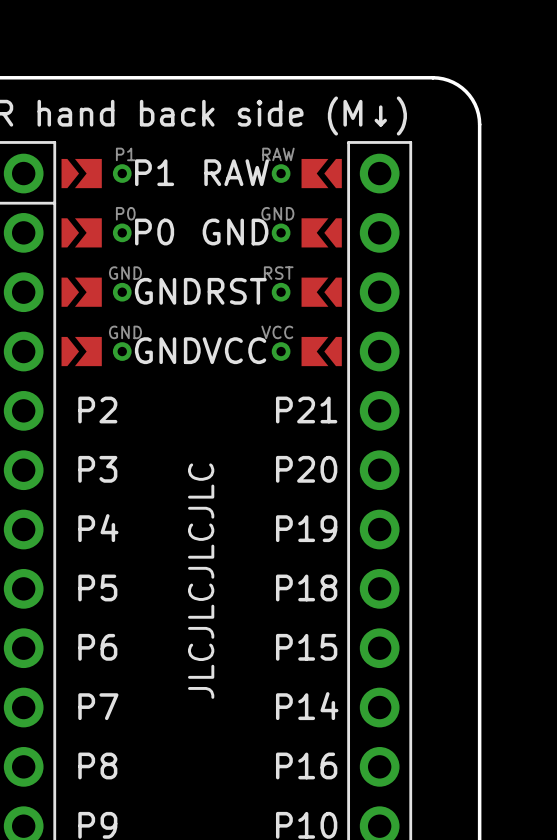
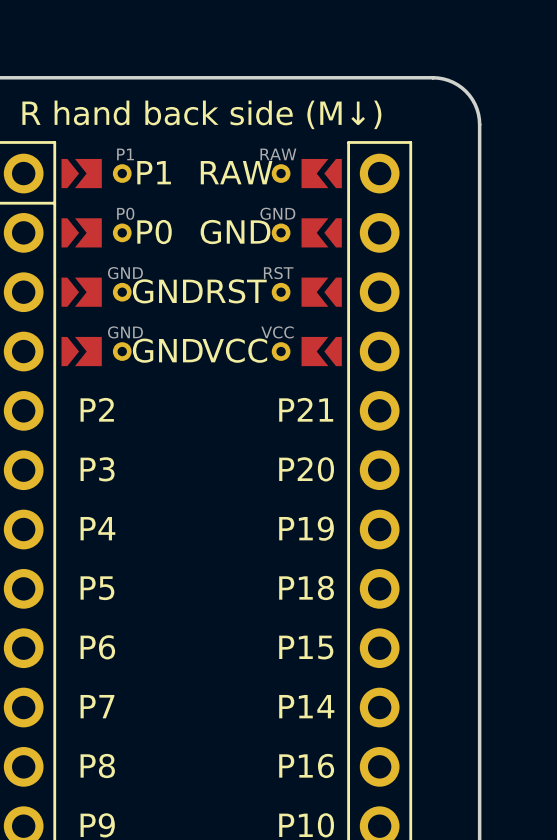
text: JLCJLCJLCJLC (201, 581) -> none

